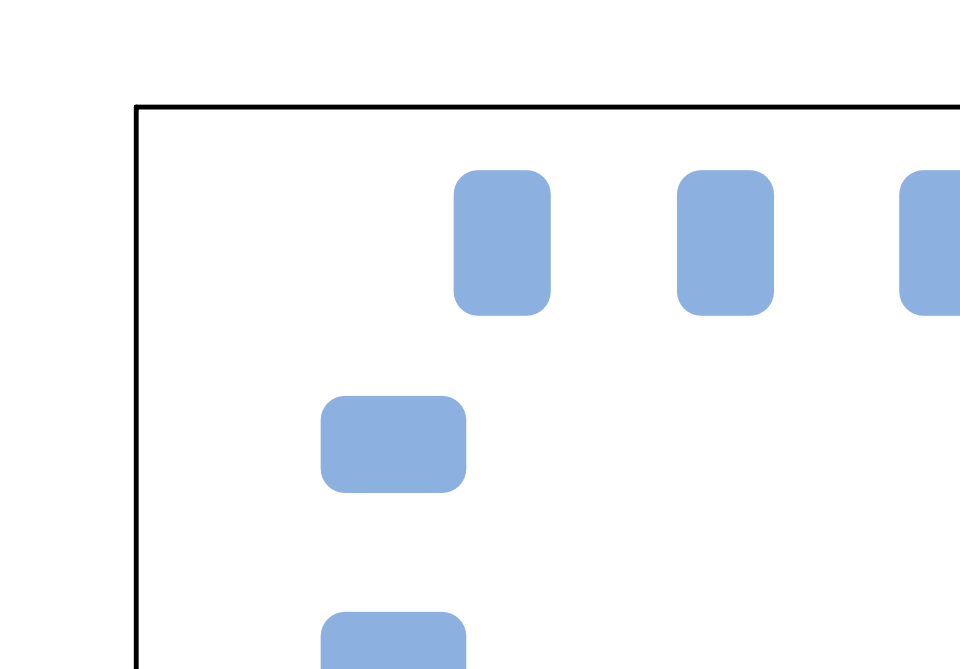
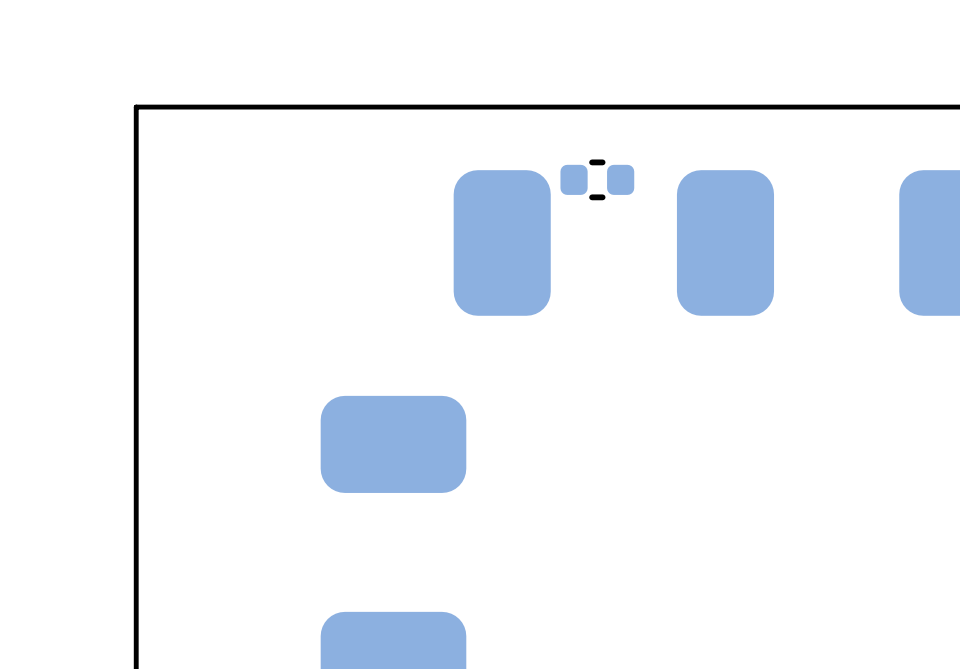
part: none -> (597, 179)

